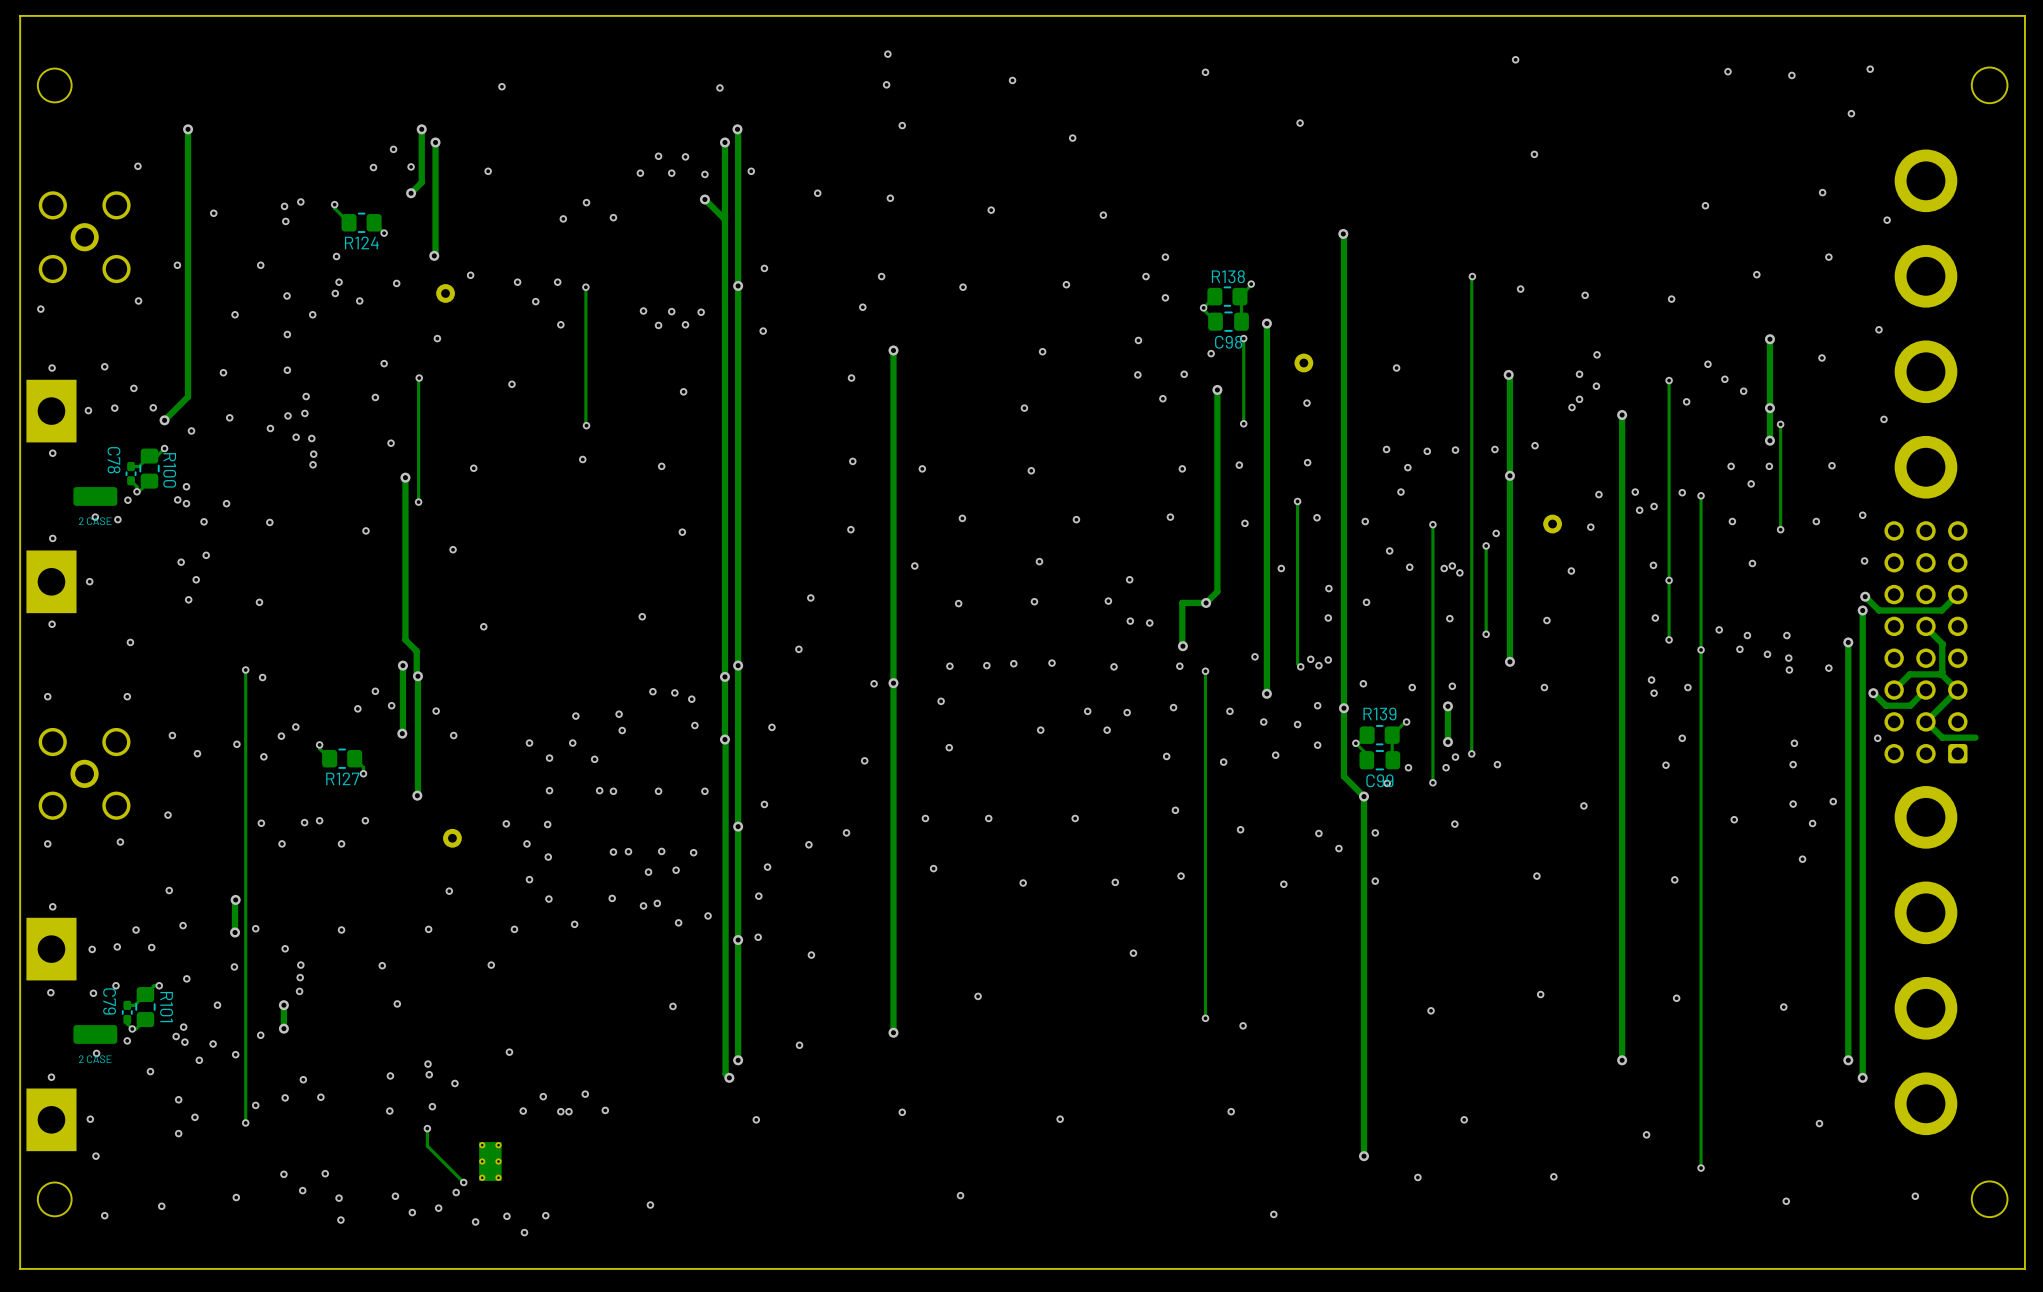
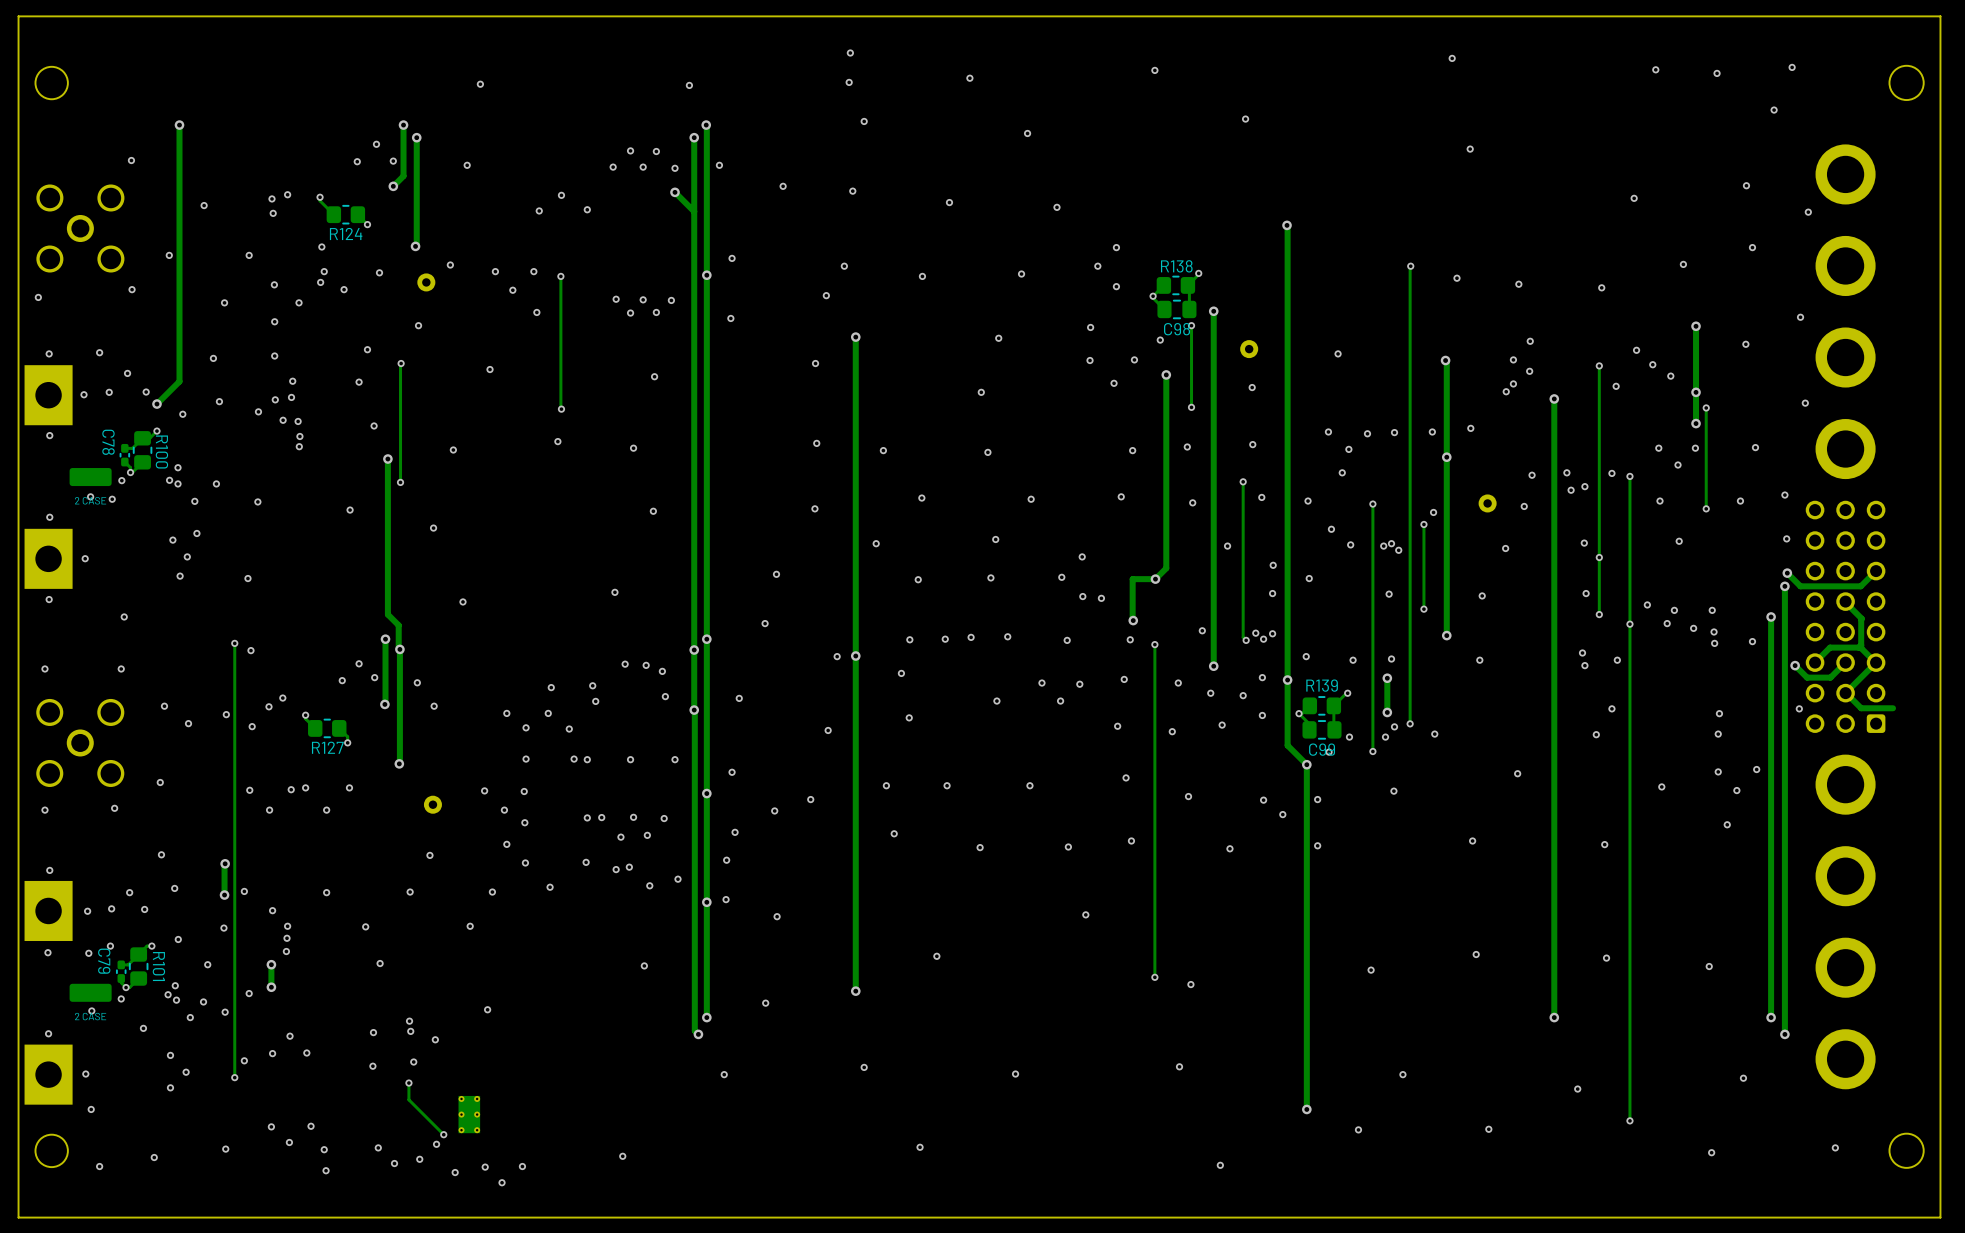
via: (585, 1094) -> none
via: (543, 1096) -> none
via: (605, 1110) -> none
via: (523, 1111) -> none
via: (560, 1111) -> none
via: (568, 1111) -> none

